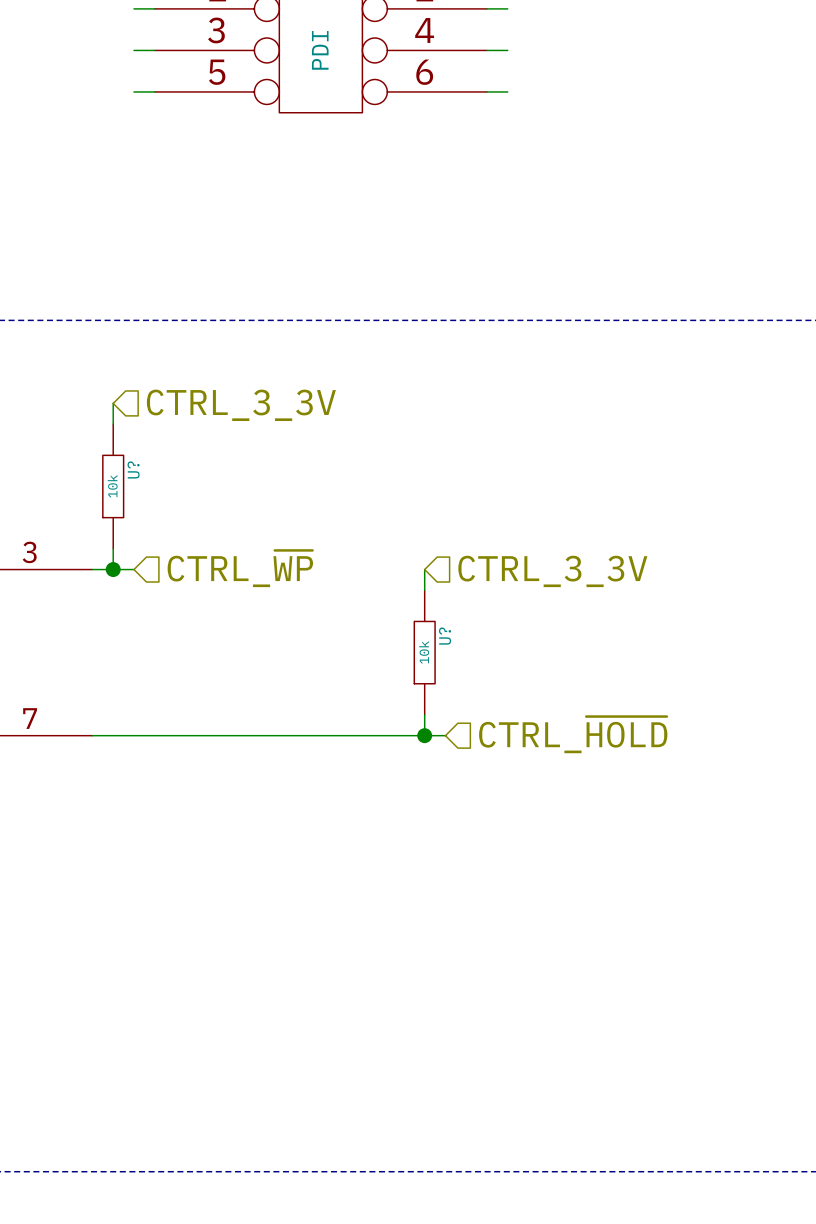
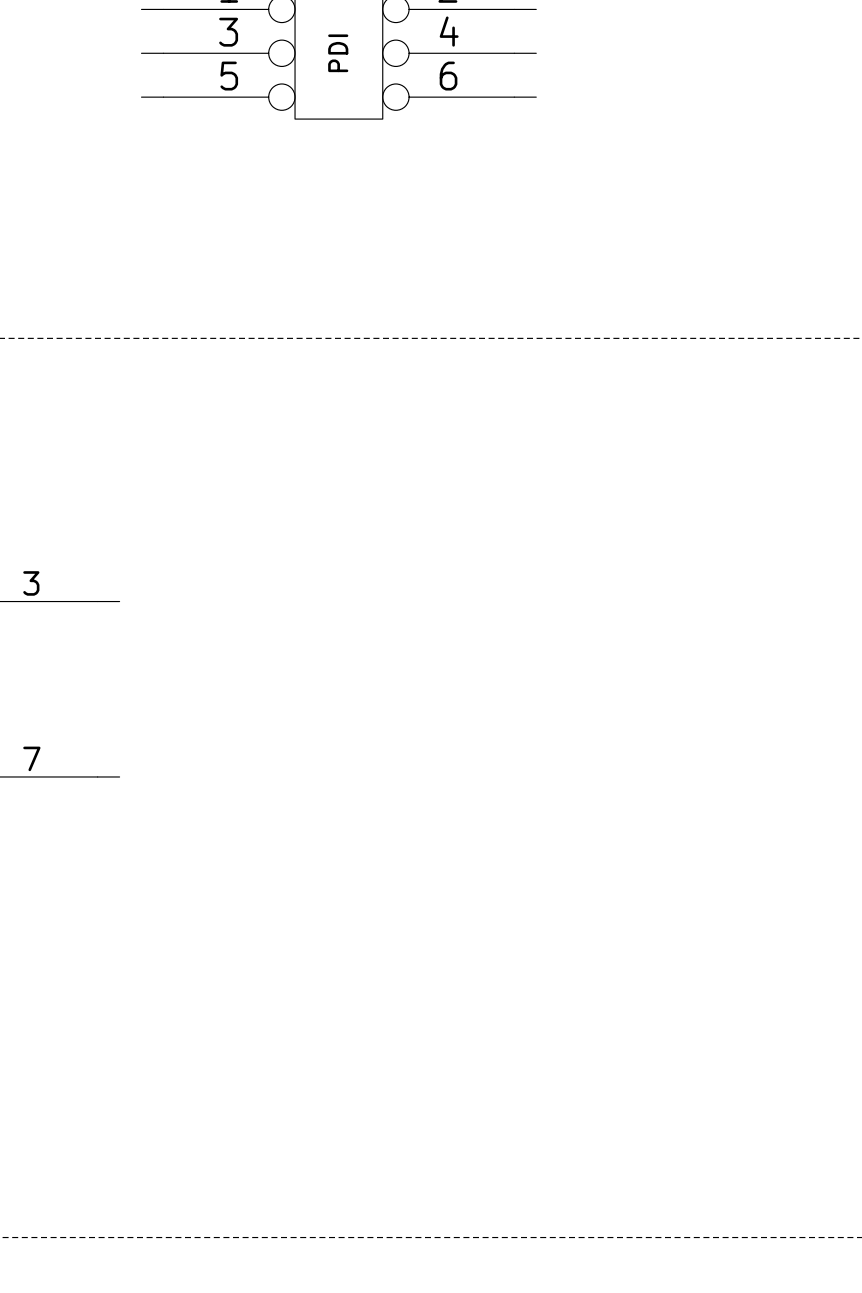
wire: (113, 403) (113, 424) -> none
hierarchical label: CTRL_3_3V (241, 405) -> none
U?: 10k (113, 486) -> none
wire: (113, 548) (113, 569) (133, 569) -> none
hierarchical label: CTRL_~{WP} (240, 568) -> none
junction: (113, 569) -> none
wire: (424, 569) (424, 590) -> none
hierarchical label: CTRL_3_3V (552, 571) -> none
U?: 10k (424, 652) -> none
wire: (424, 714) (424, 735) -> none
hierarchical label: CTRL_~{HOLD} (573, 734) -> none
wire: (113, 735) (445, 735) -> none
junction: (424, 735) -> none

